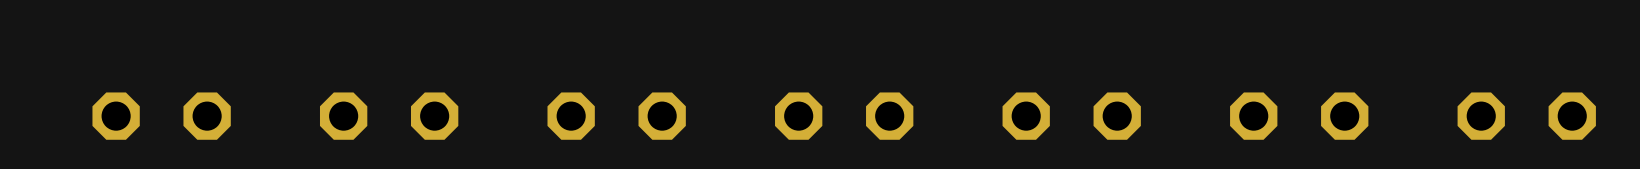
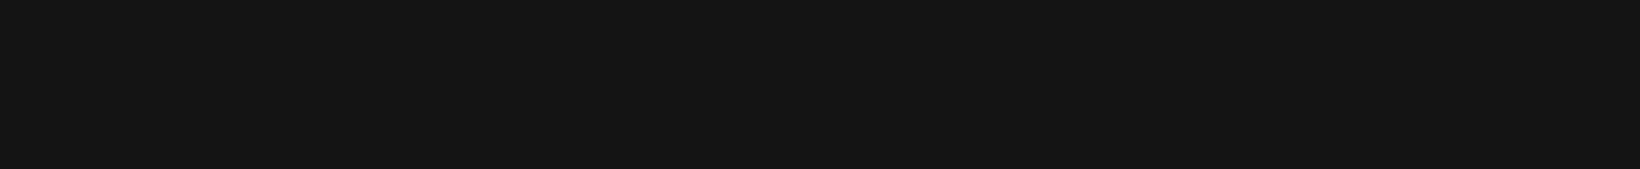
part: (161, 116) -> none
part: (389, 116) -> none
part: (616, 116) -> none
part: (844, 116) -> none
part: (1071, 116) -> none
part: (1299, 116) -> none
part: (1526, 116) -> none

